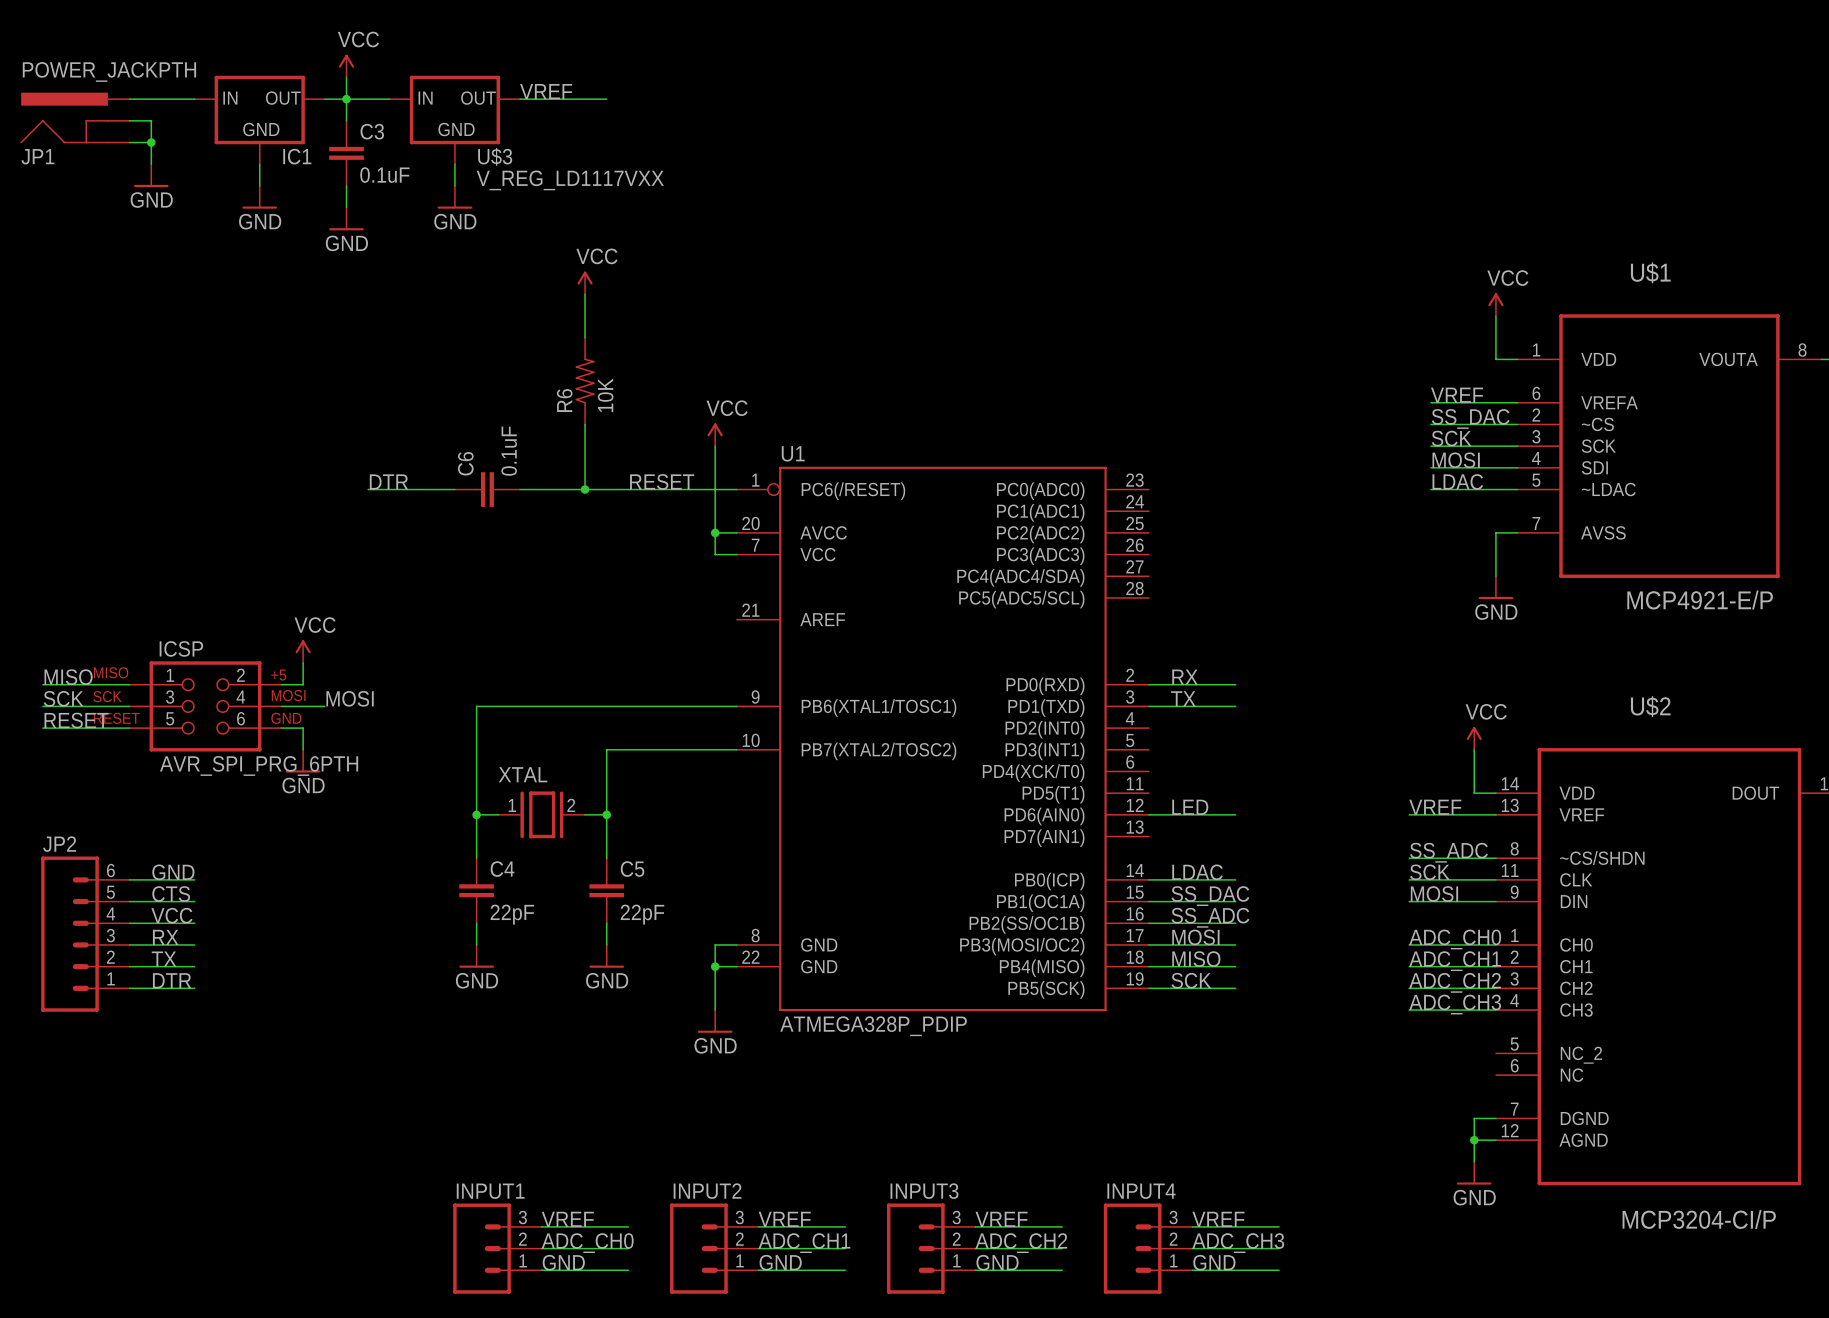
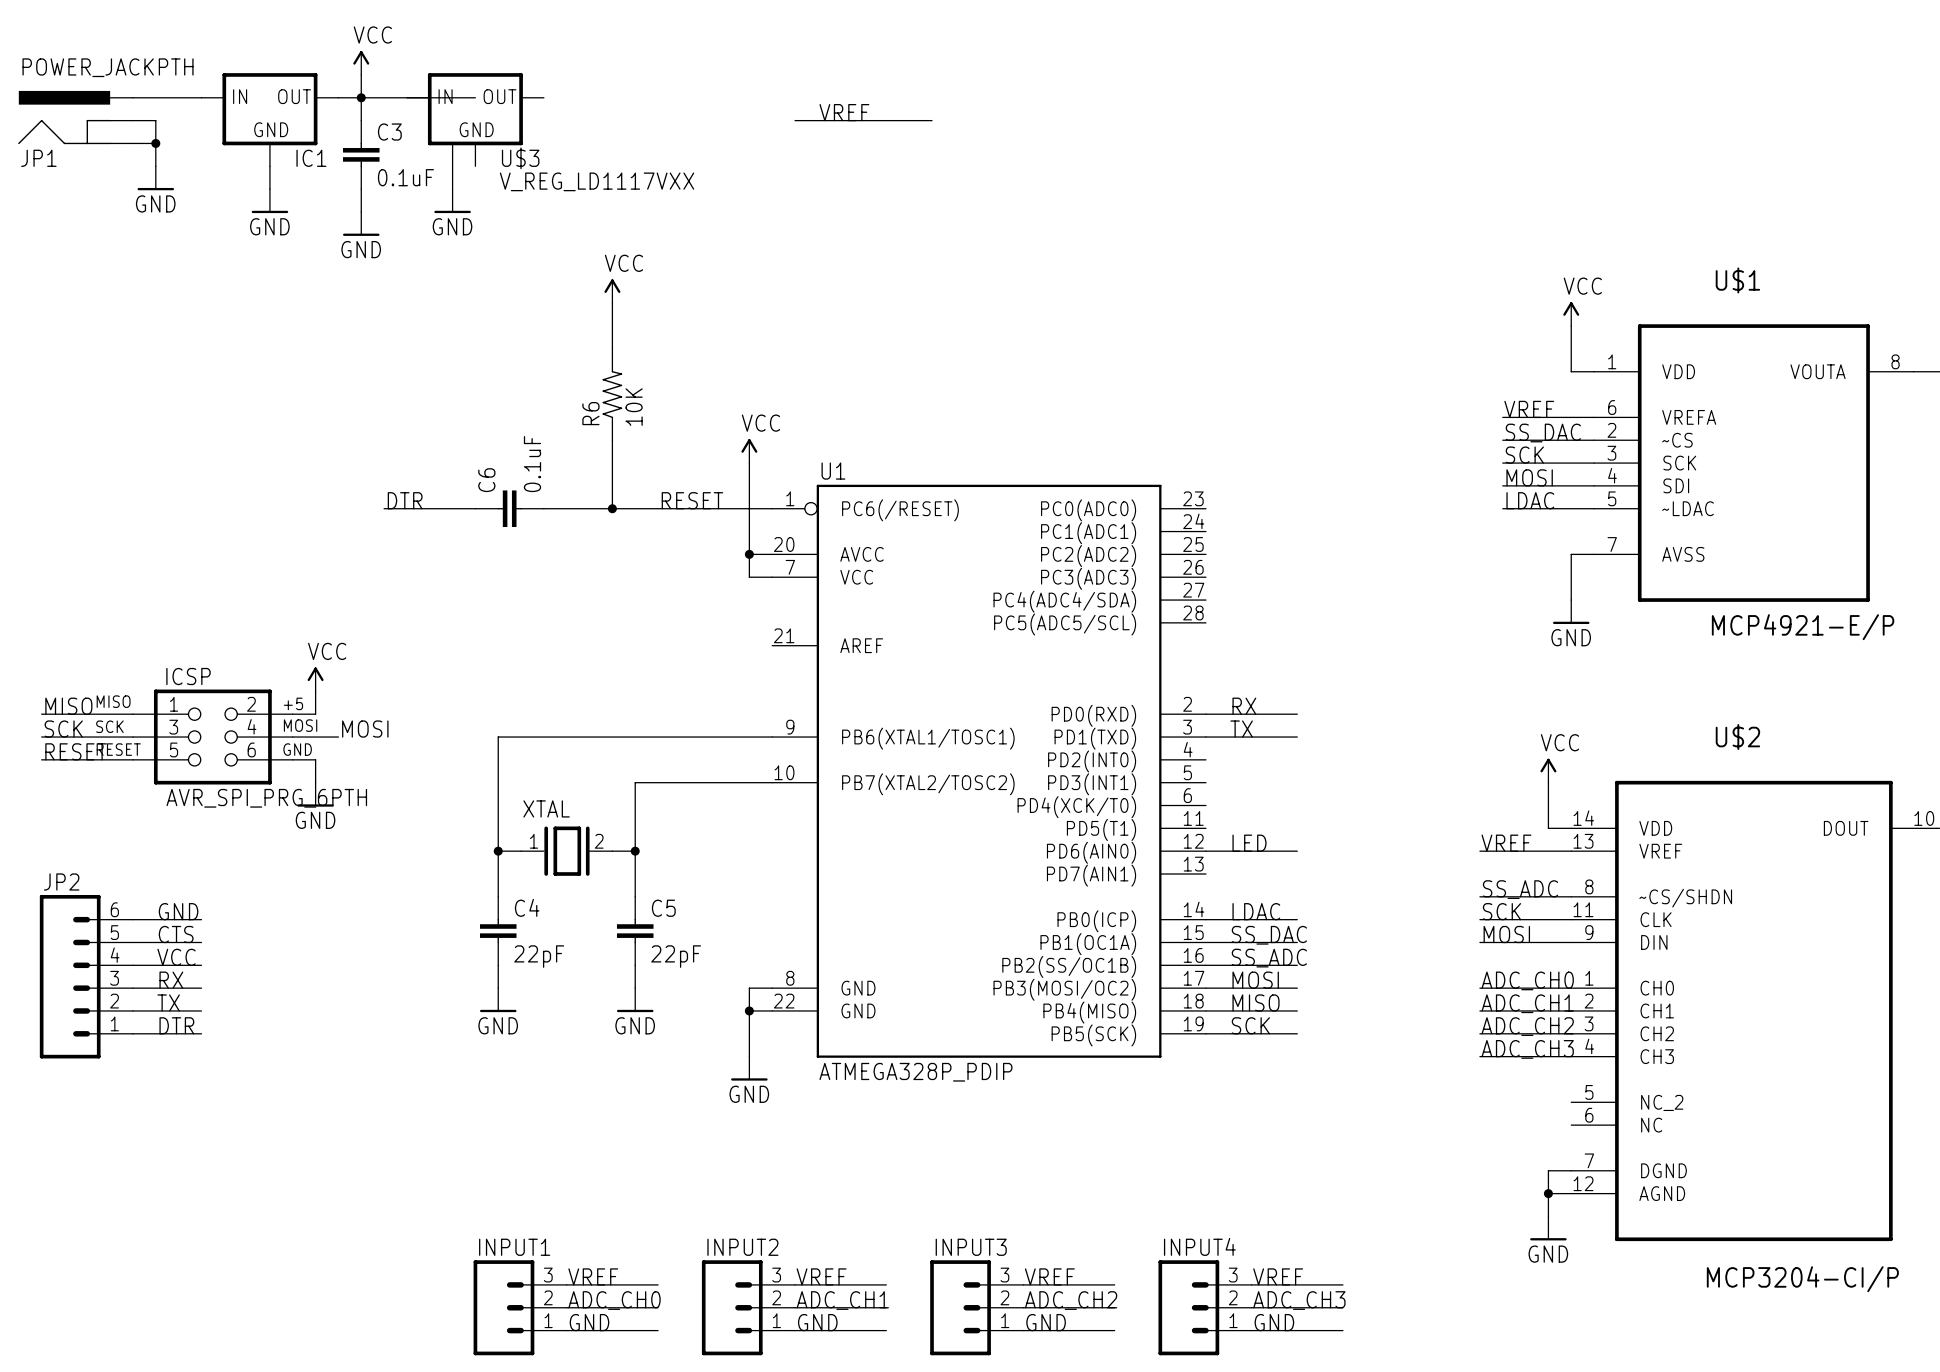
label: VREF (546, 91) -> none
wire: none -> (406, 97) (475, 97)
wire: (519, 99) (606, 99) -> none
label: none -> VREF (844, 112)
wire: none -> (795, 120) (932, 120)
wire: none -> (475, 143) (452, 143) (452, 189)
wire: (454, 164) (454, 185) -> none
power symbol position: GND (454, 197) -> GND (452, 201)

